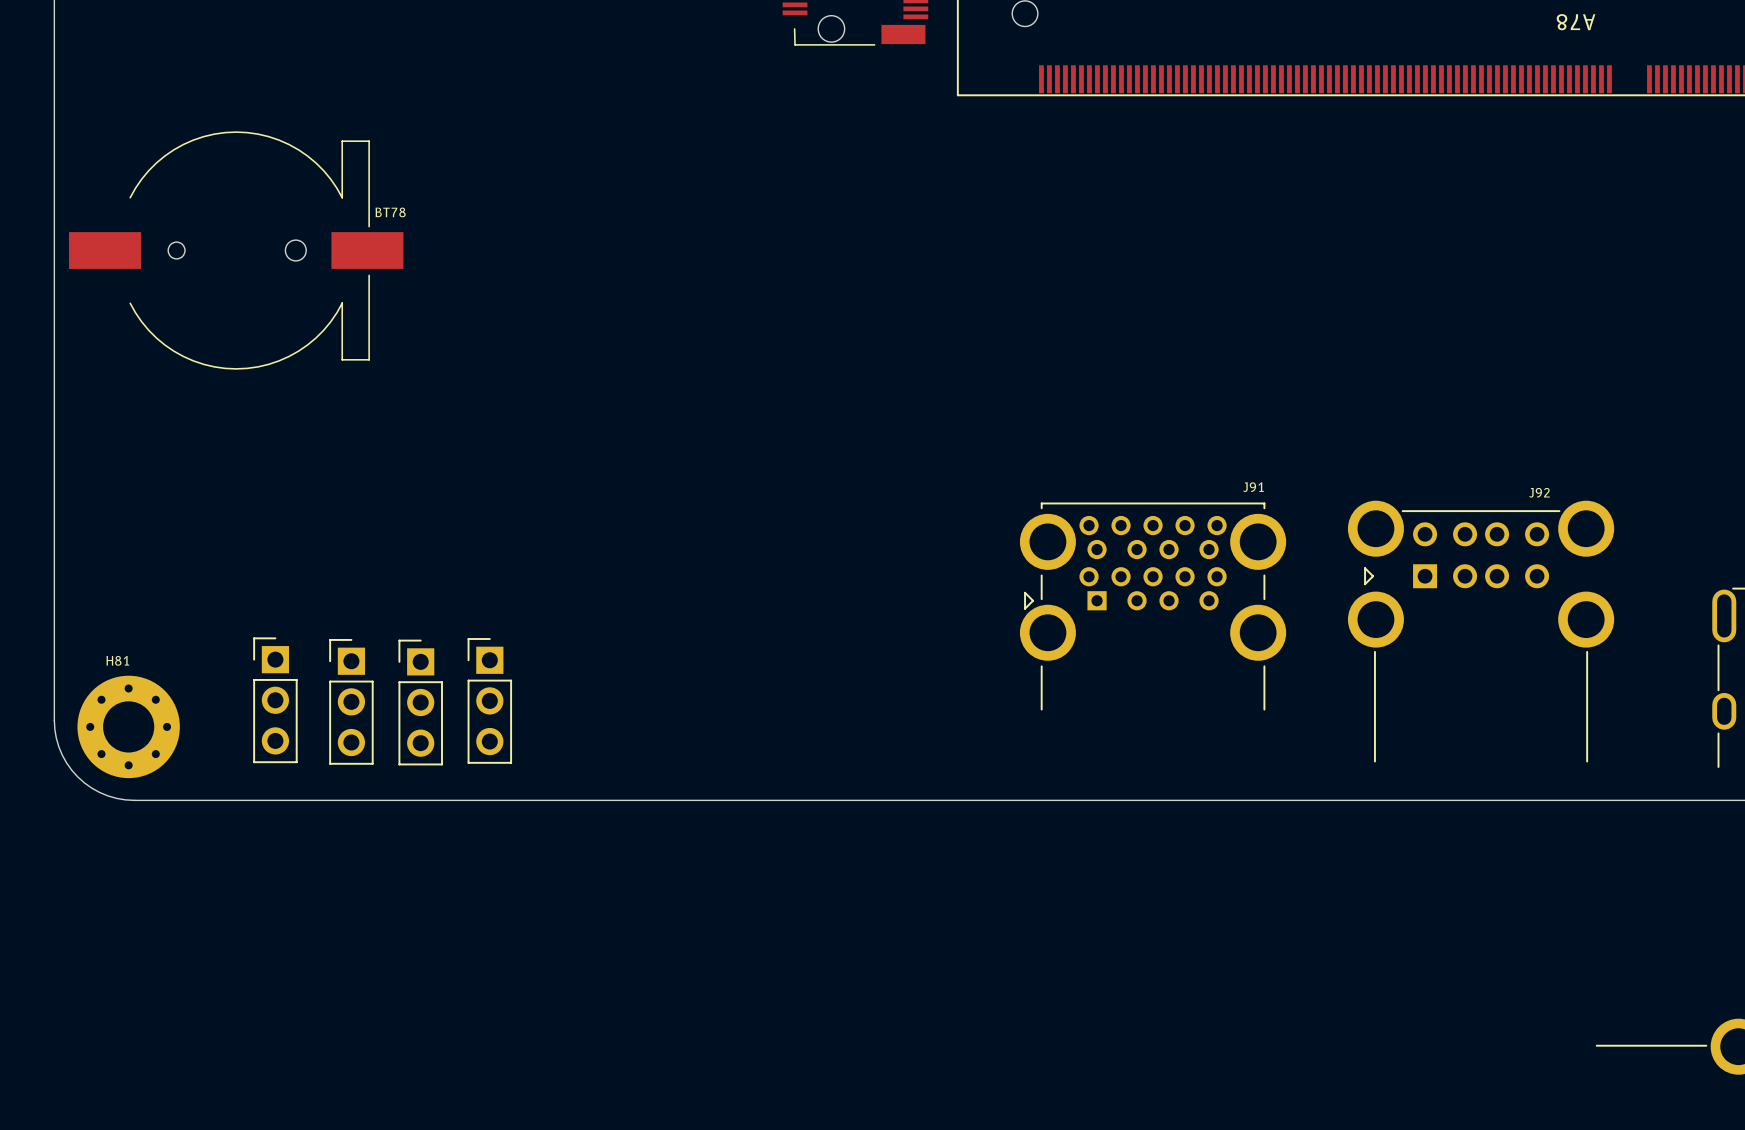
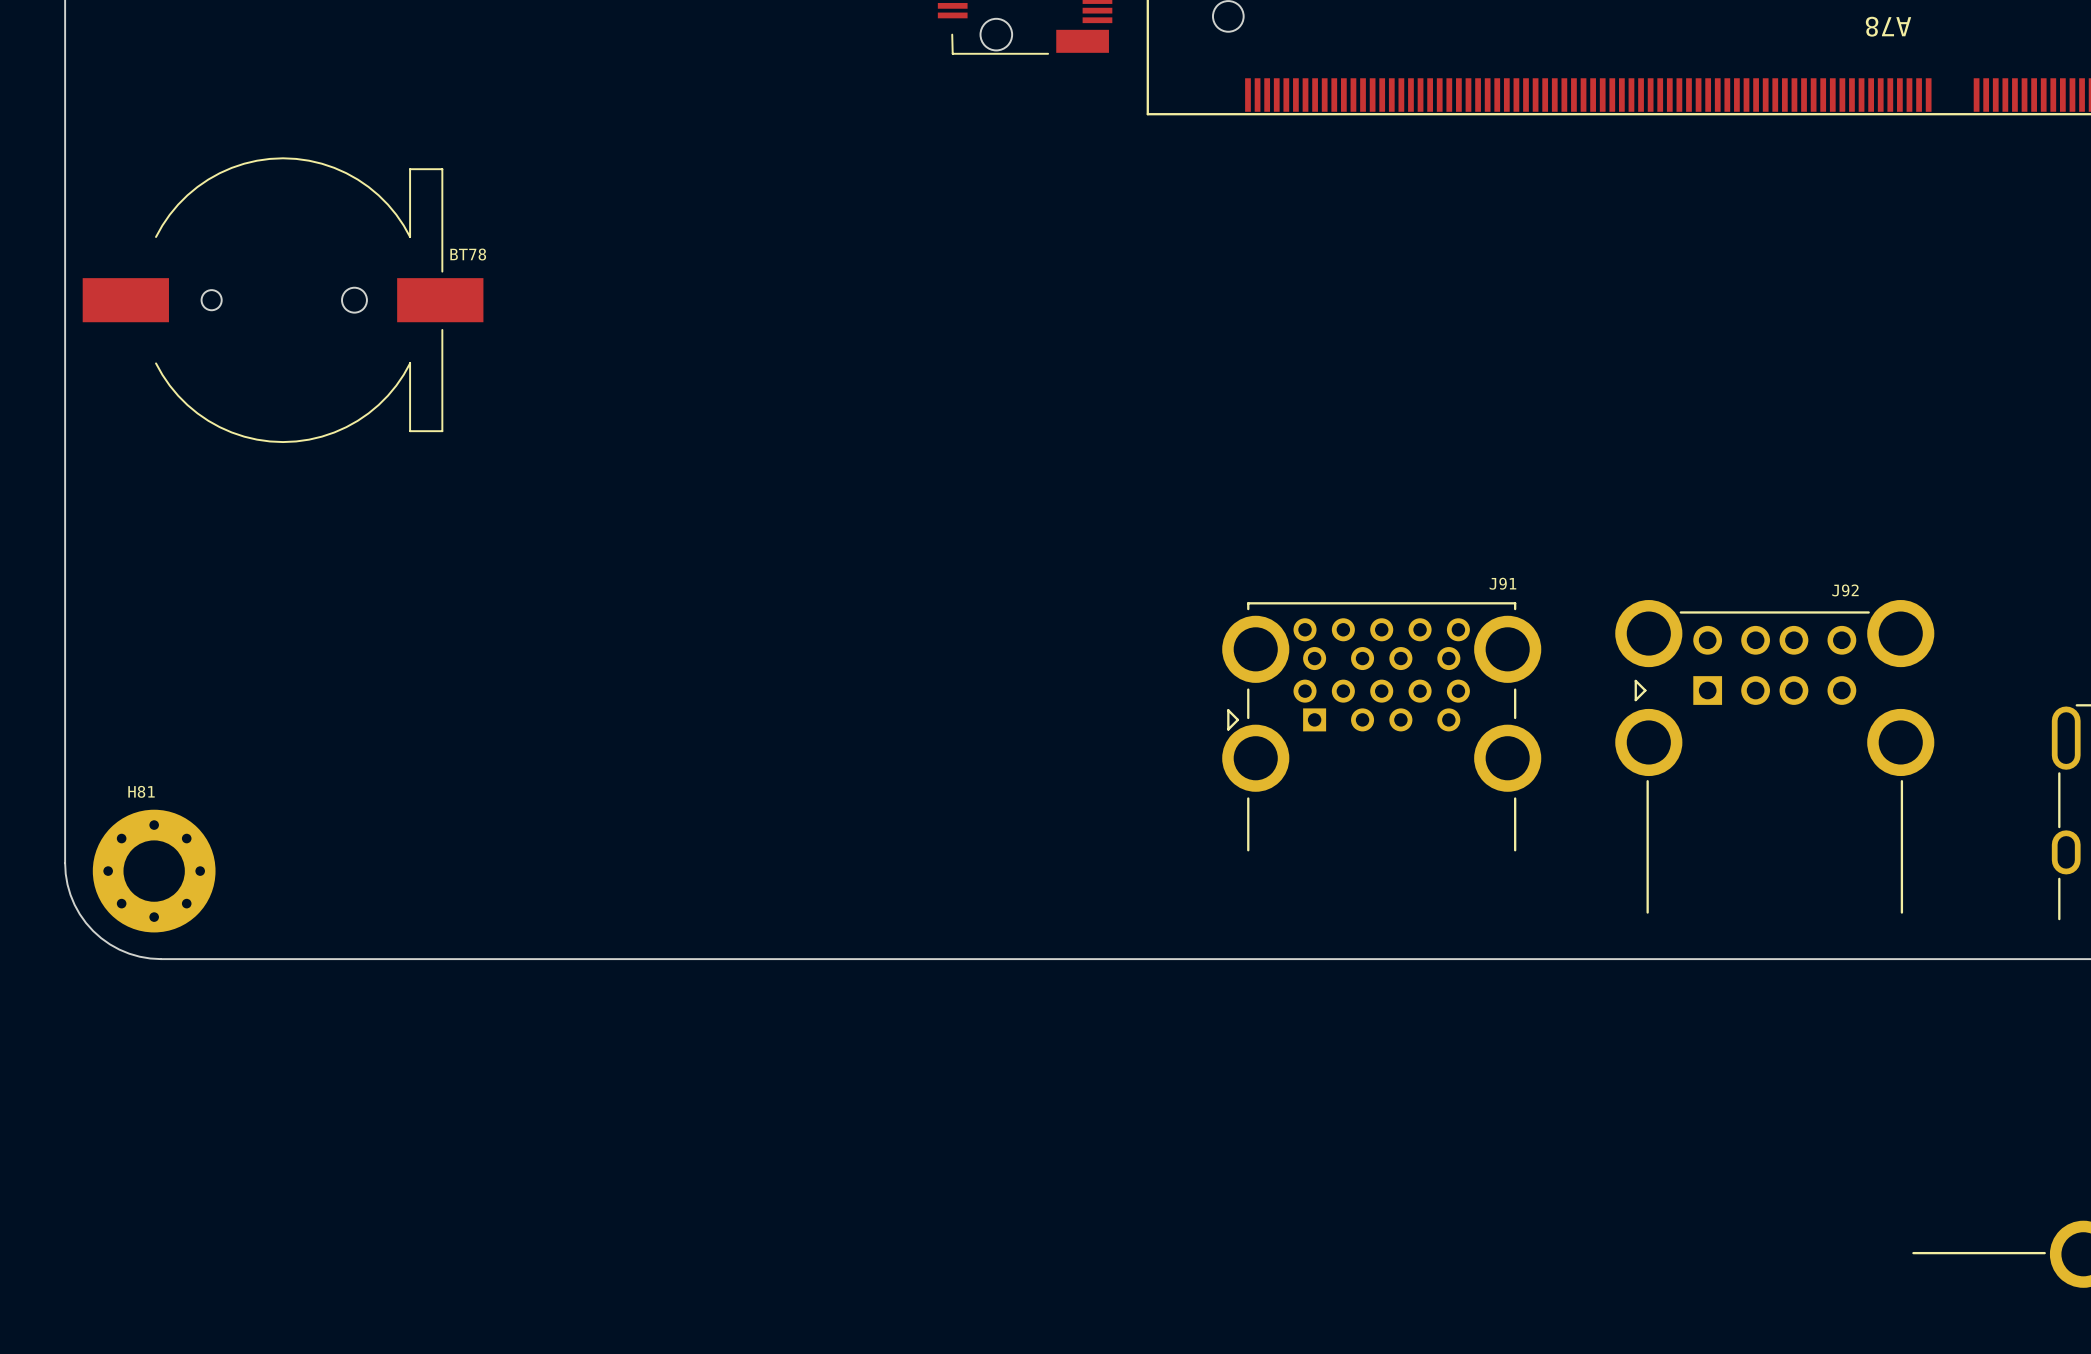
part: (275, 700) -> none
part: (489, 700) -> none
part: (351, 701) -> none
part: (420, 702) -> none

